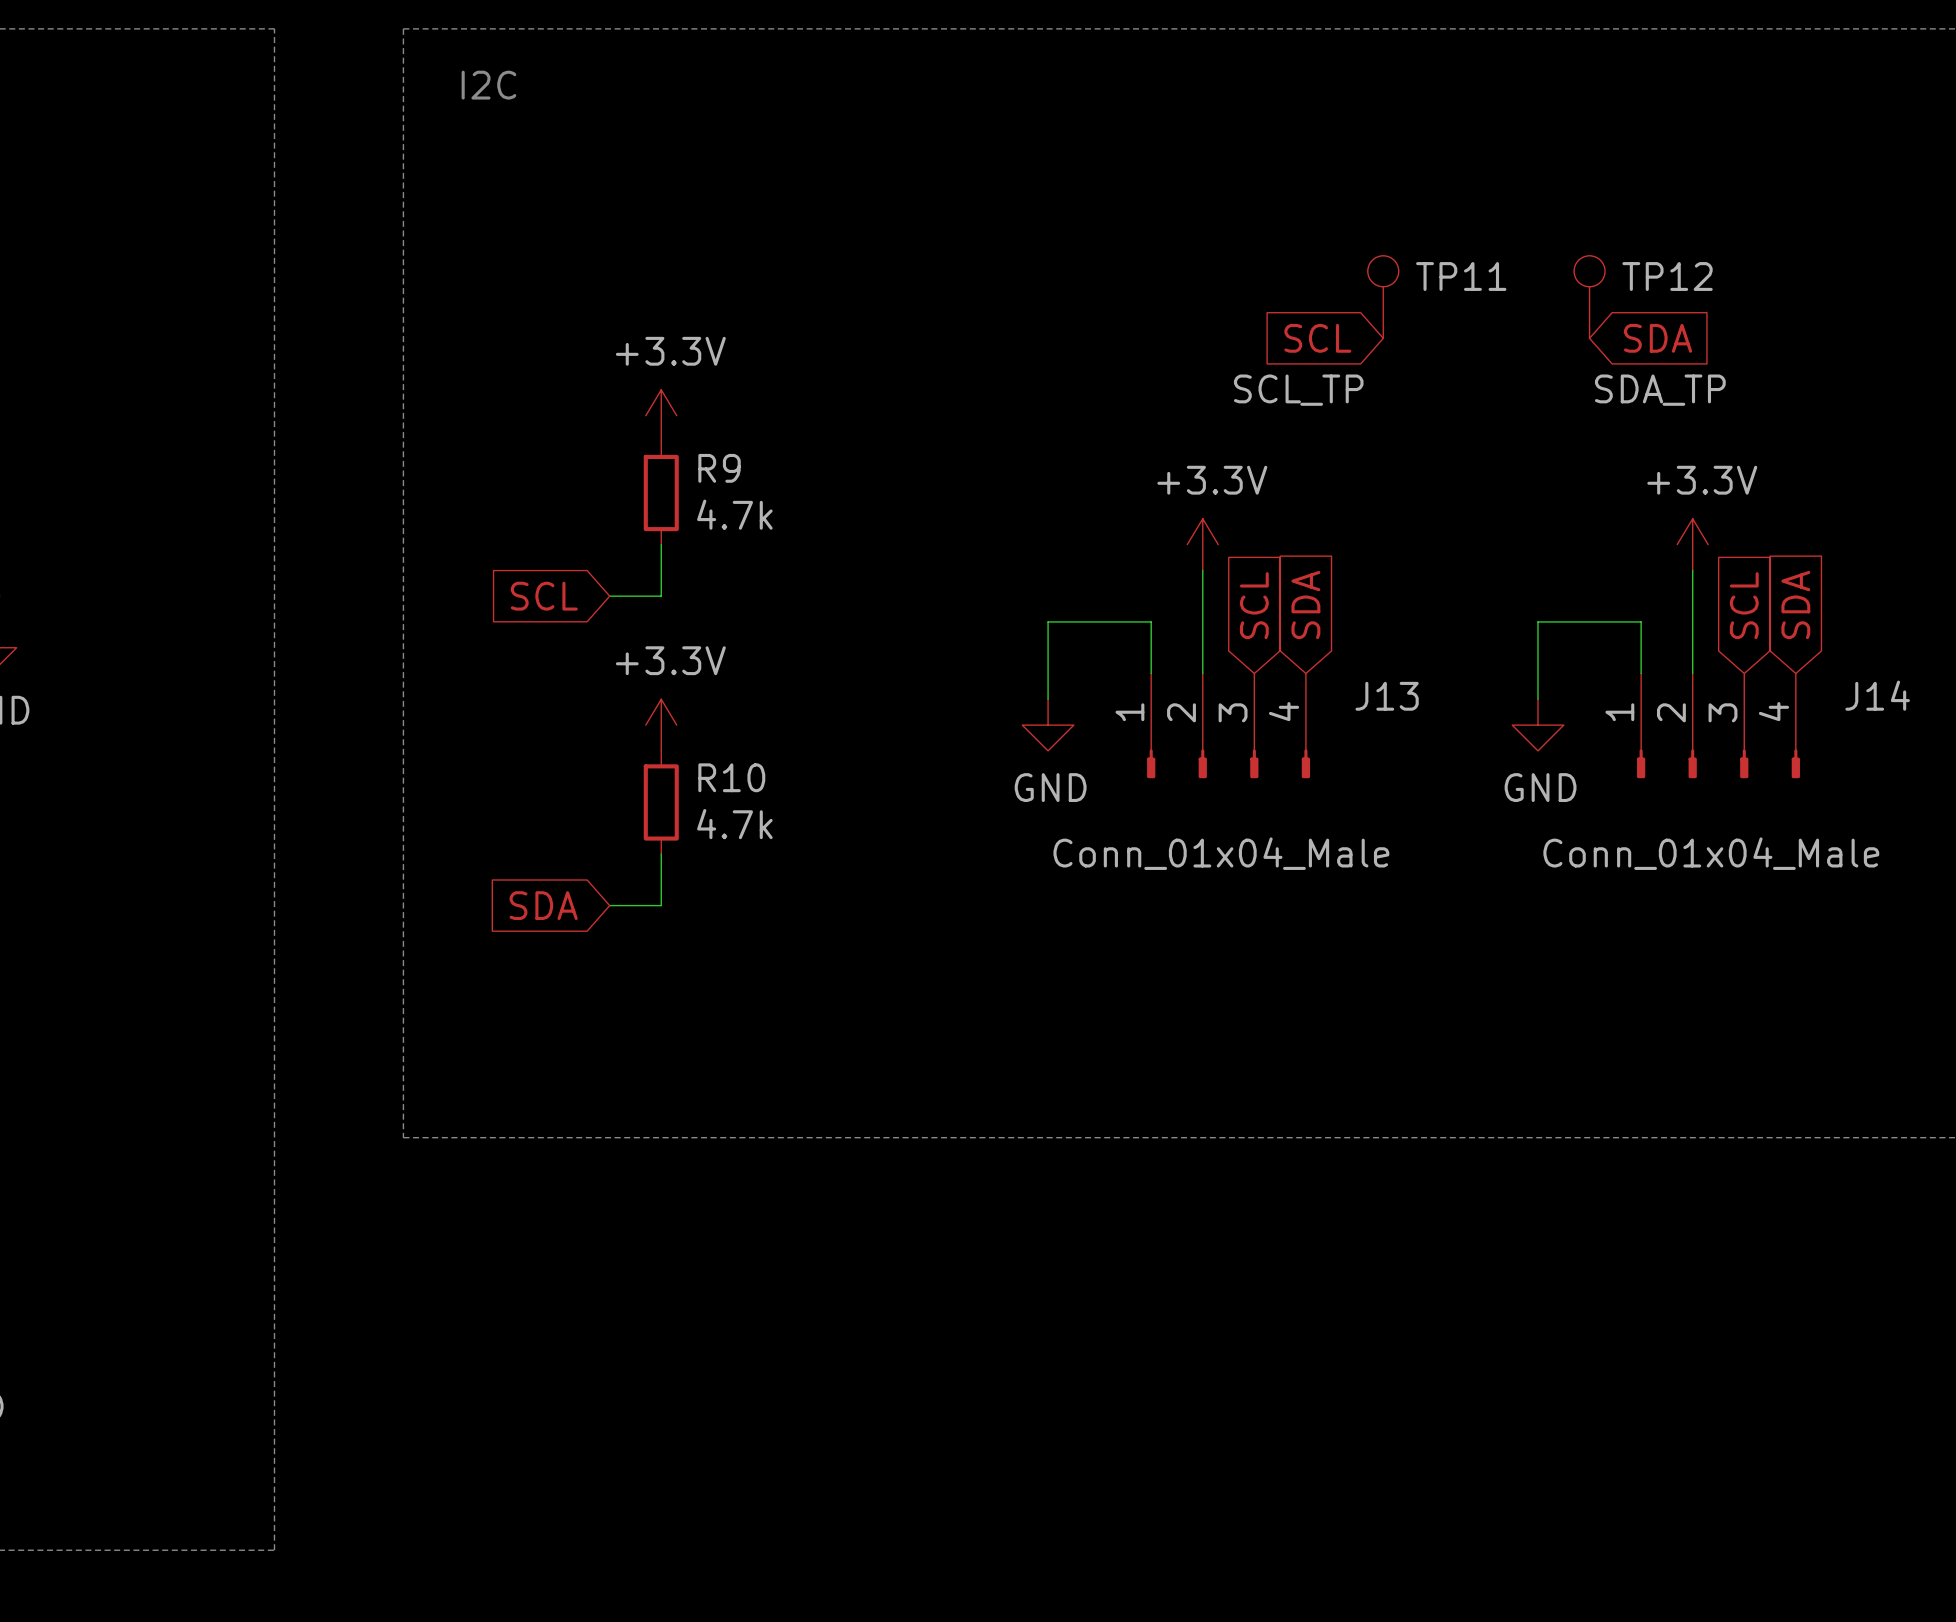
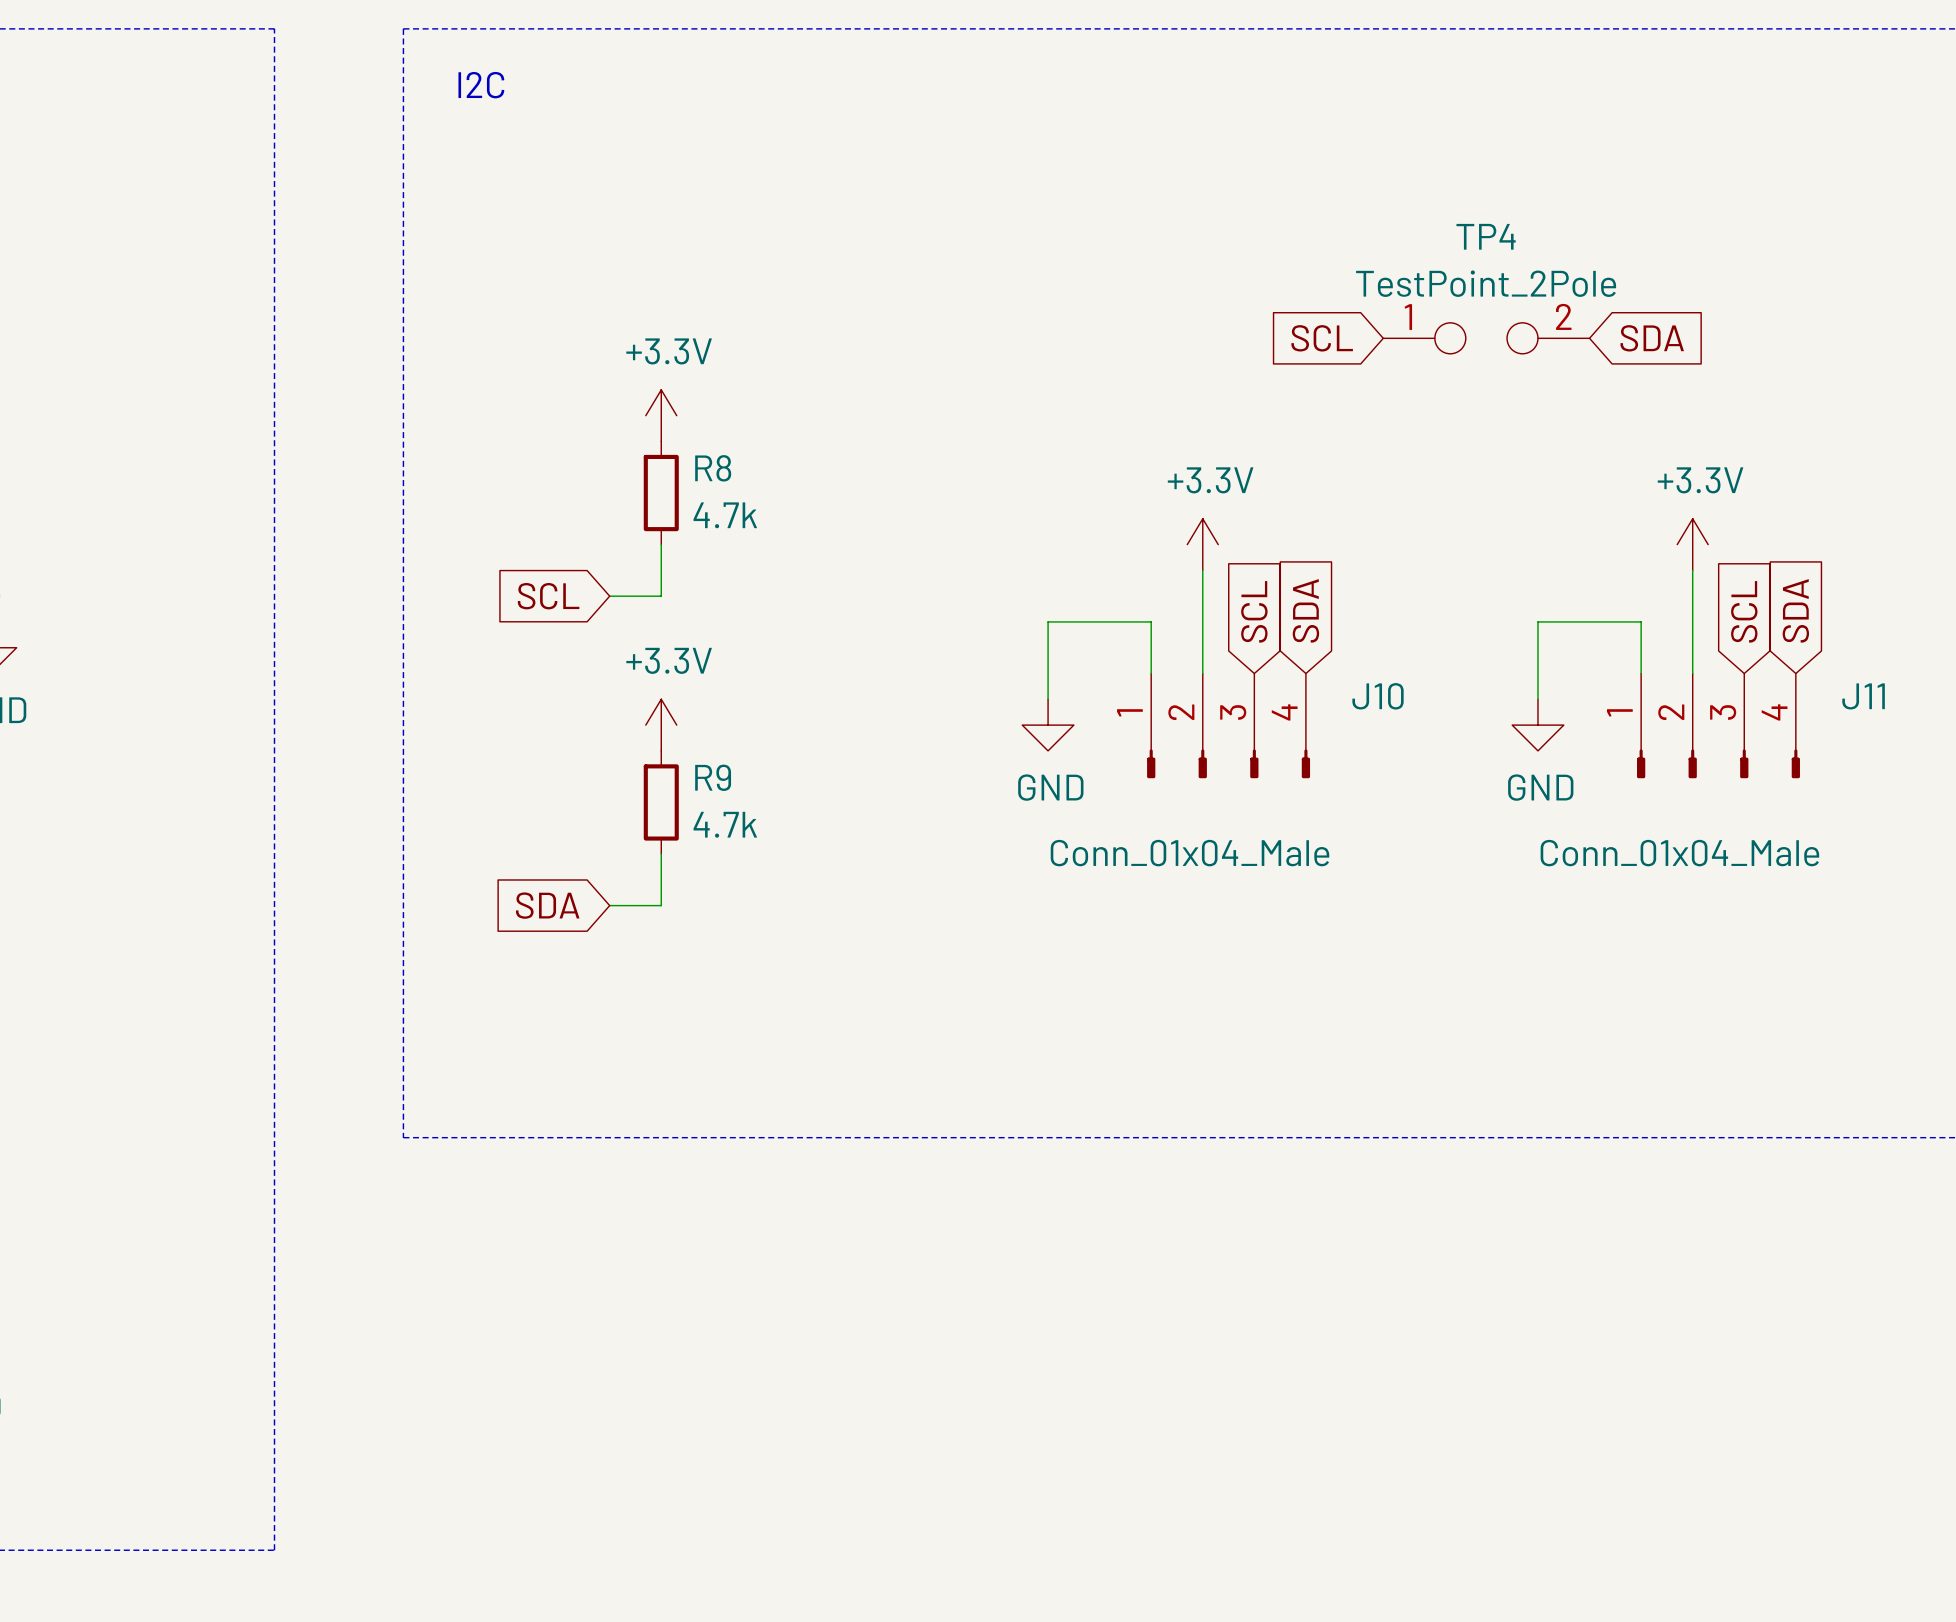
TP11: SCL_TP (1383, 297) -> none
TP12: SDA_TP (1589, 297) -> none
TP4: none -> TestPoint_2Pole (1486, 338)
R9 name: R9 (719, 468) -> R8 (713, 468)
J14 name: J14 (1877, 695) -> J11 (1863, 696)
J13 name: J13 (1387, 696) -> J10 (1378, 696)
R10 name: R10 (731, 777) -> R9 (713, 777)

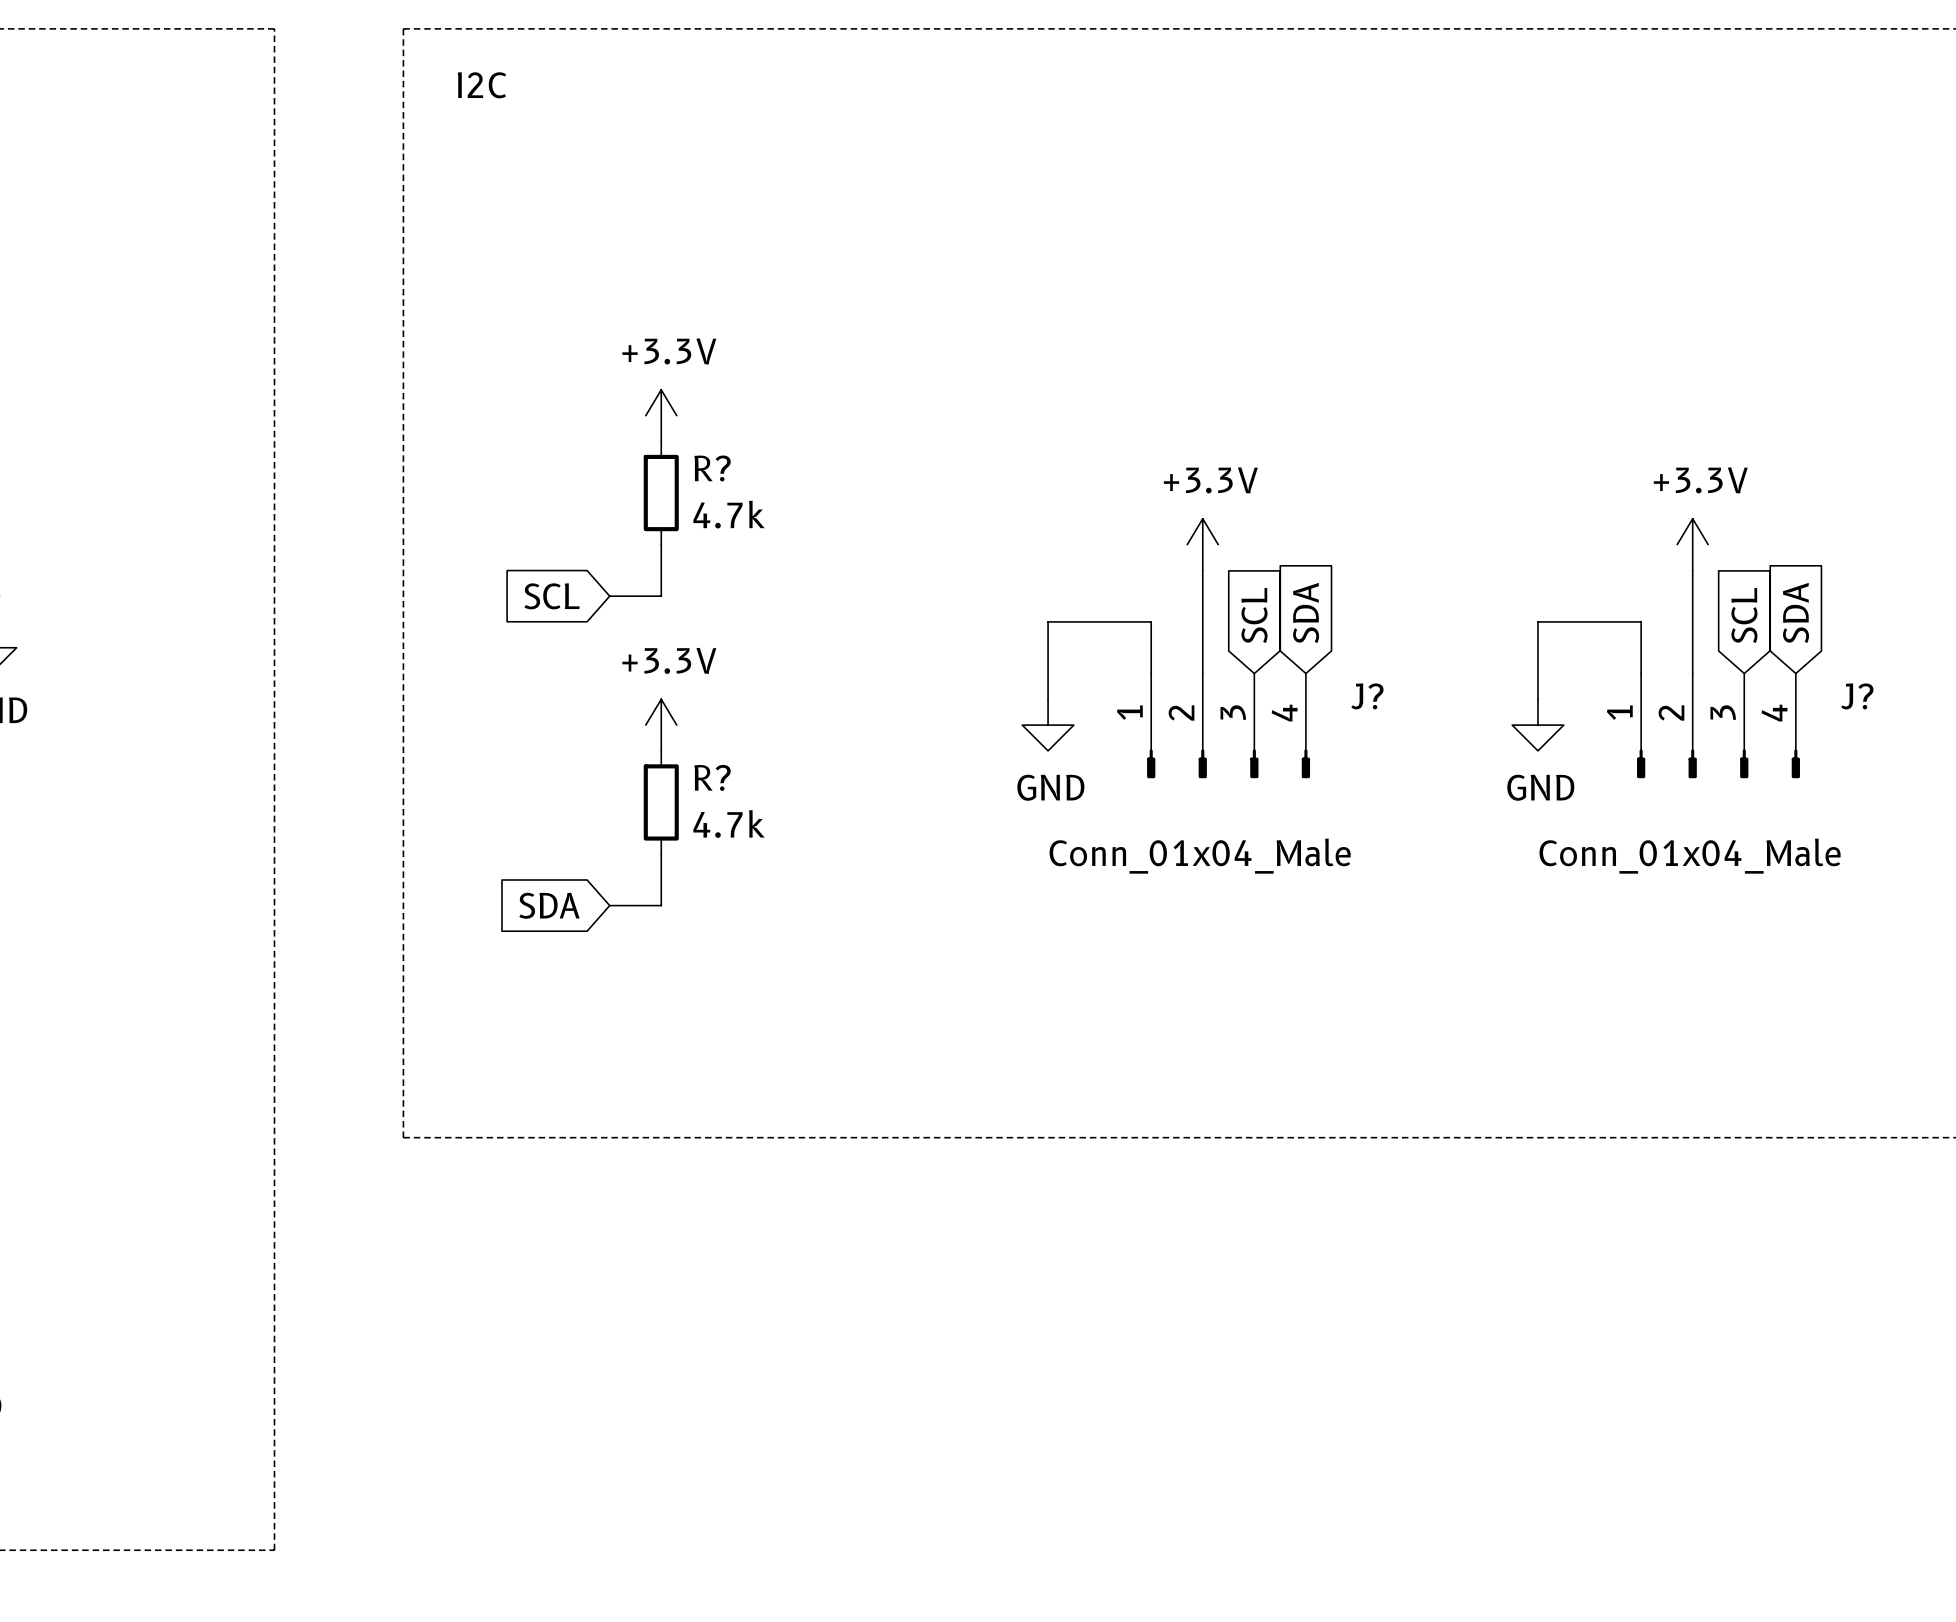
global label: SCL (1322, 338) -> none
TP4: TestPoint_2Pole (1486, 338) -> none
global label: SDA (1652, 338) -> none
R8 name: R8 (713, 468) -> R? (712, 468)
J10 name: J10 (1378, 696) -> J? (1367, 696)
J11 name: J11 (1863, 696) -> J? (1857, 696)
R9 name: R9 (713, 777) -> R? (712, 777)

